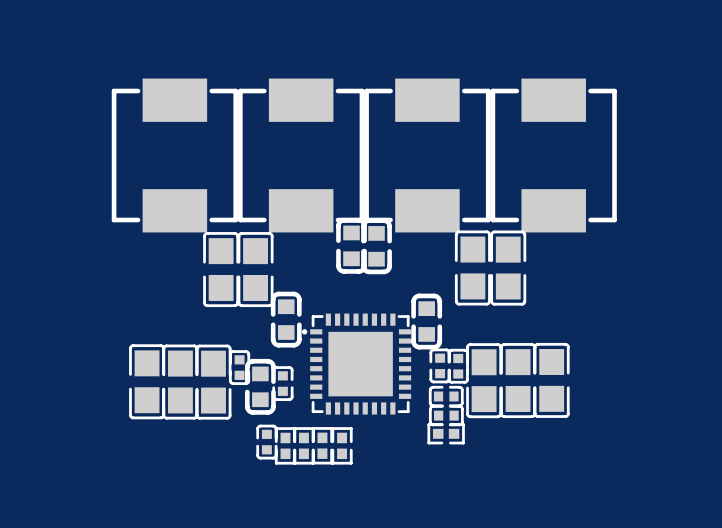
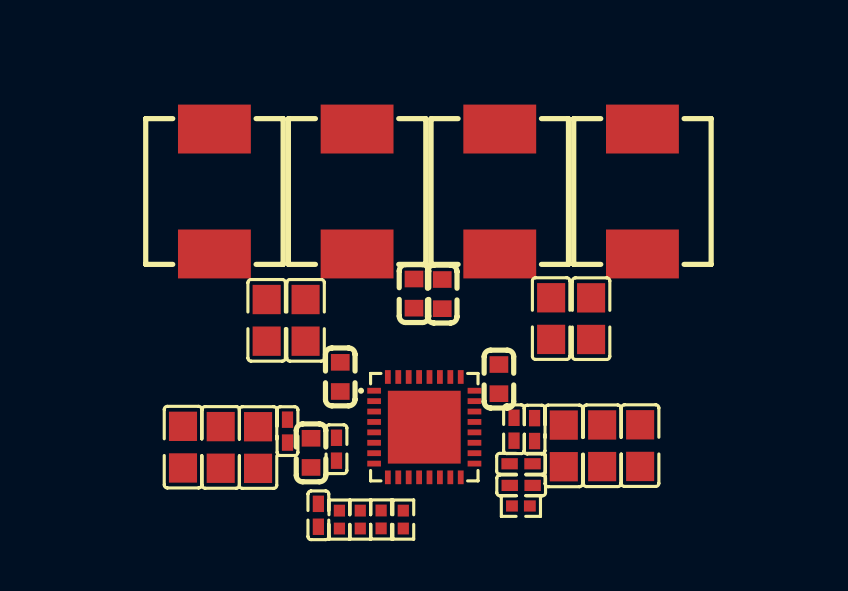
part footprint: [429, 348, 451, 384] -> [502, 403, 527, 456]
part footprint: [447, 348, 469, 384] -> [522, 403, 547, 456]
part footprint: [228, 350, 251, 386] -> [275, 405, 300, 458]
part footprint: [272, 366, 294, 402] -> [324, 423, 349, 476]
part footprint: [428, 385, 464, 408] -> [495, 451, 547, 476]
part footprint: [428, 405, 464, 427] -> [495, 473, 548, 498]
part footprint: [256, 424, 278, 460] -> [306, 489, 331, 542]

